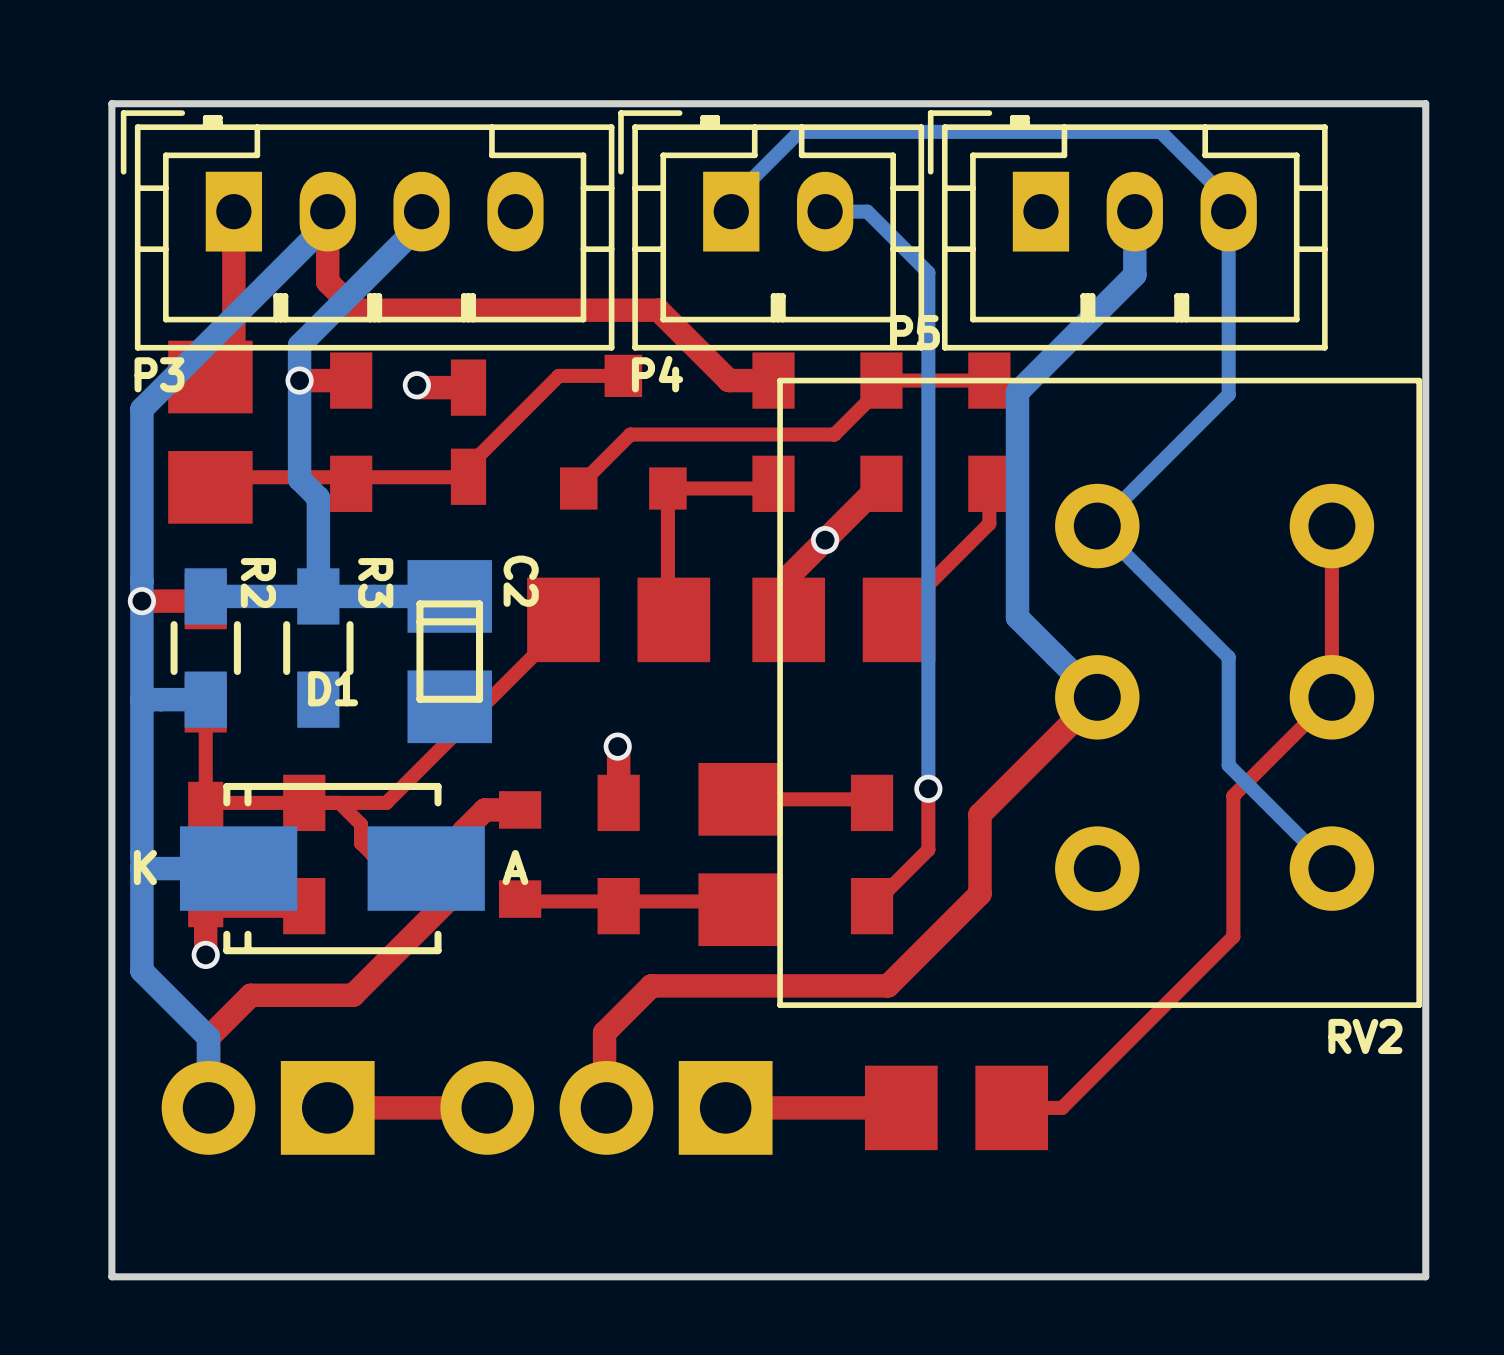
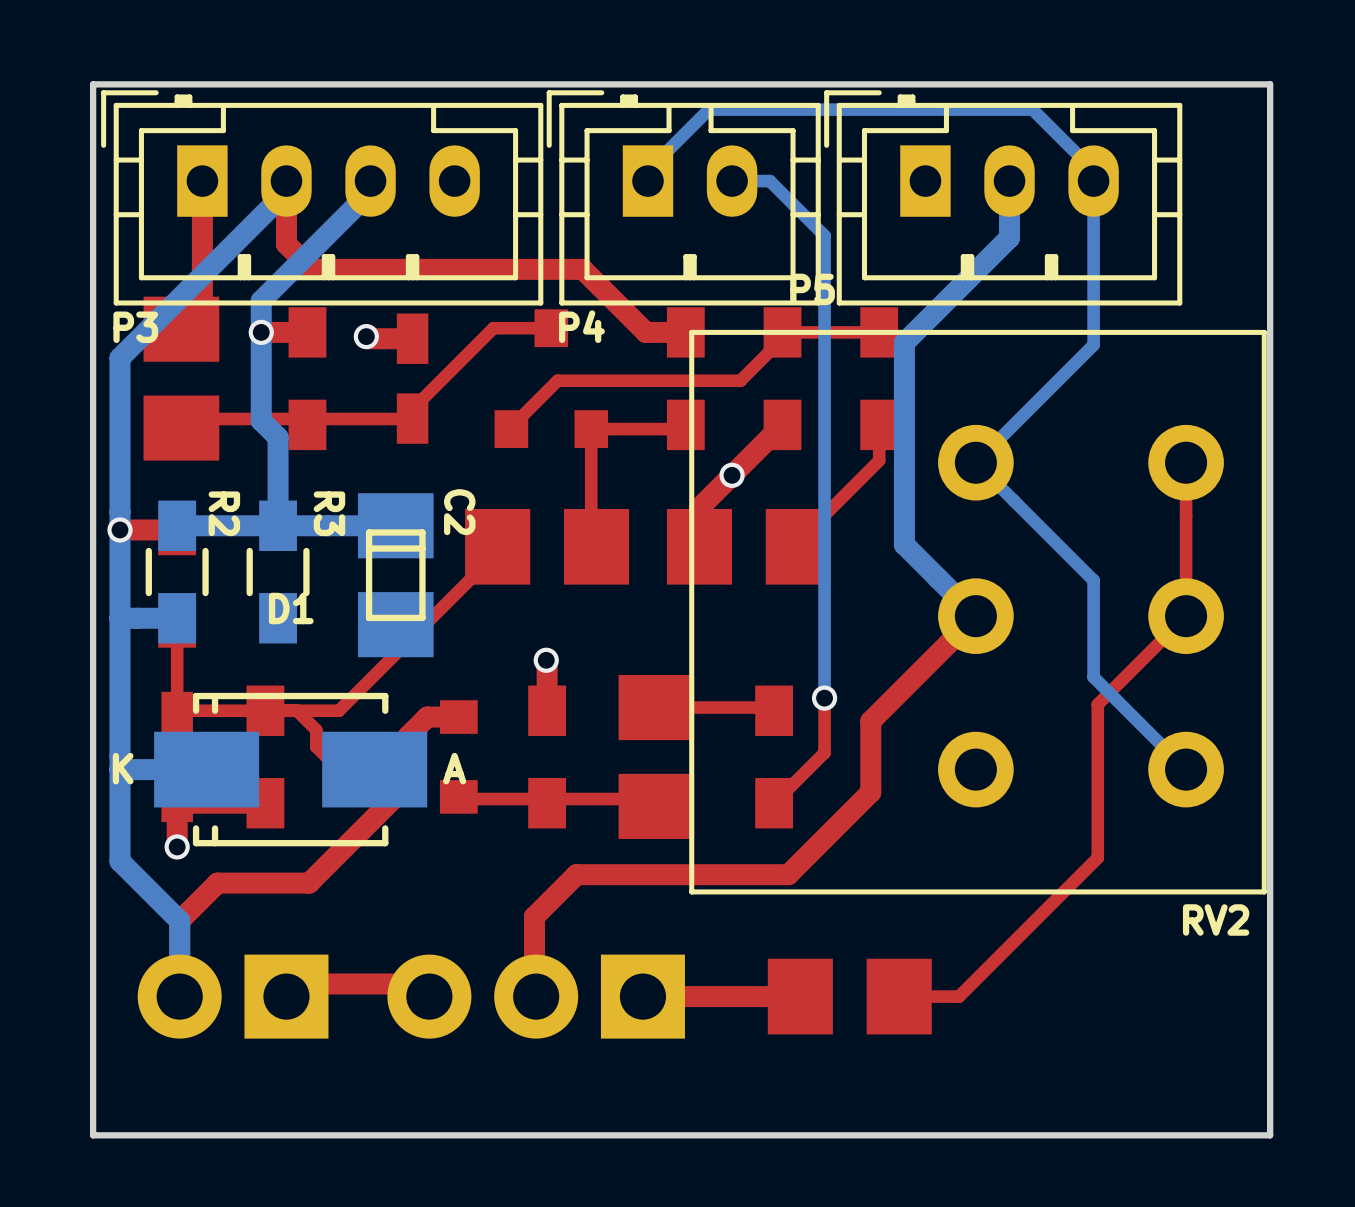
top track: (1233, 936) (1062, 1107) (1011, 1107) -> (1097, 830) (1097, 857) (959, 996) (900, 996)
part position: (268, 1107) -> (233, 996)
part position: (606, 1107) -> (536, 996)
top track: (901, 1107) (725, 1107) -> (800, 996) (642, 996)
part position: (956, 1107) -> (849, 996)

